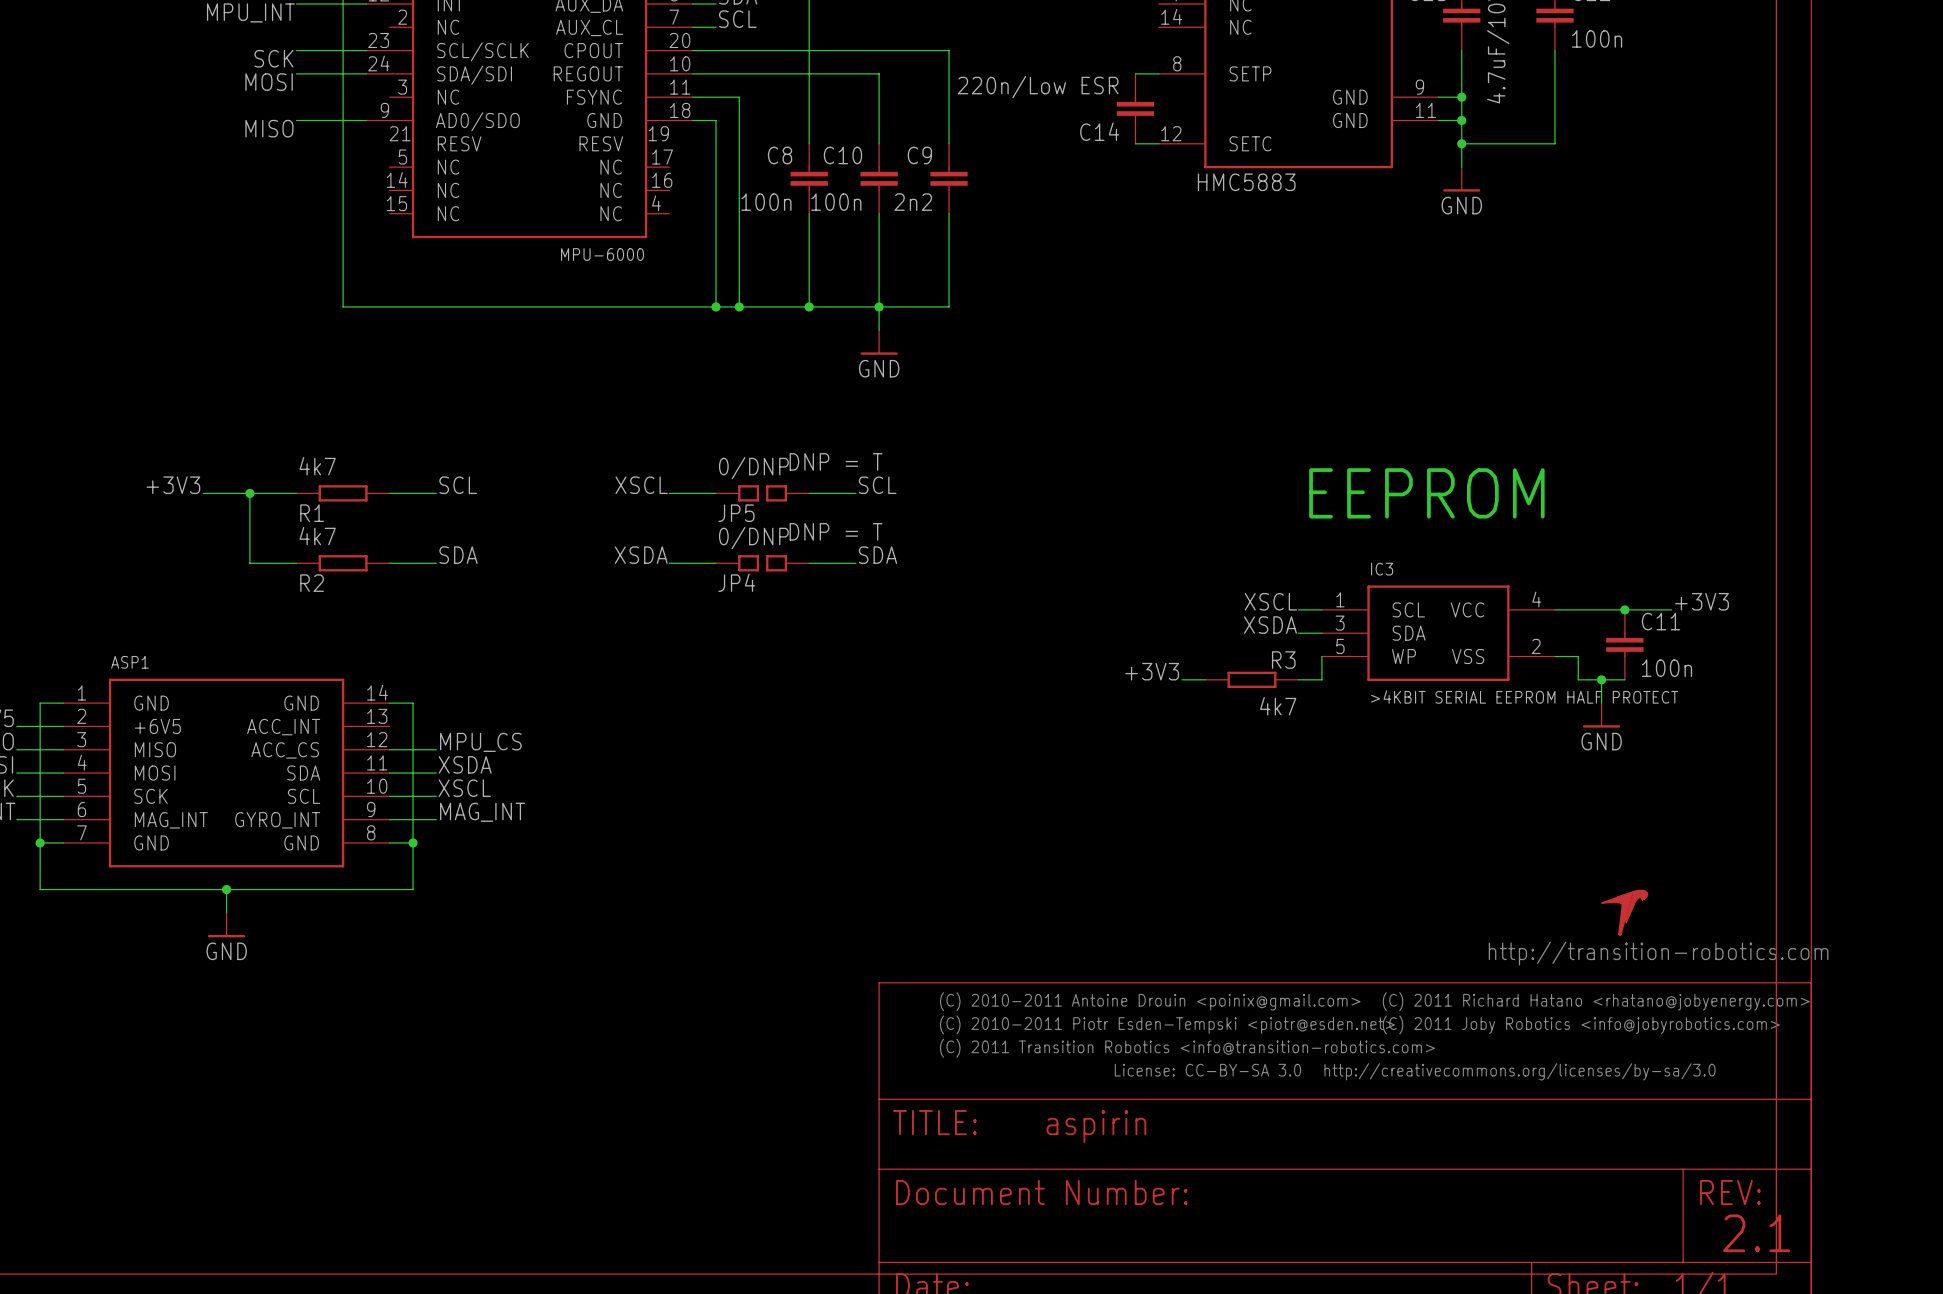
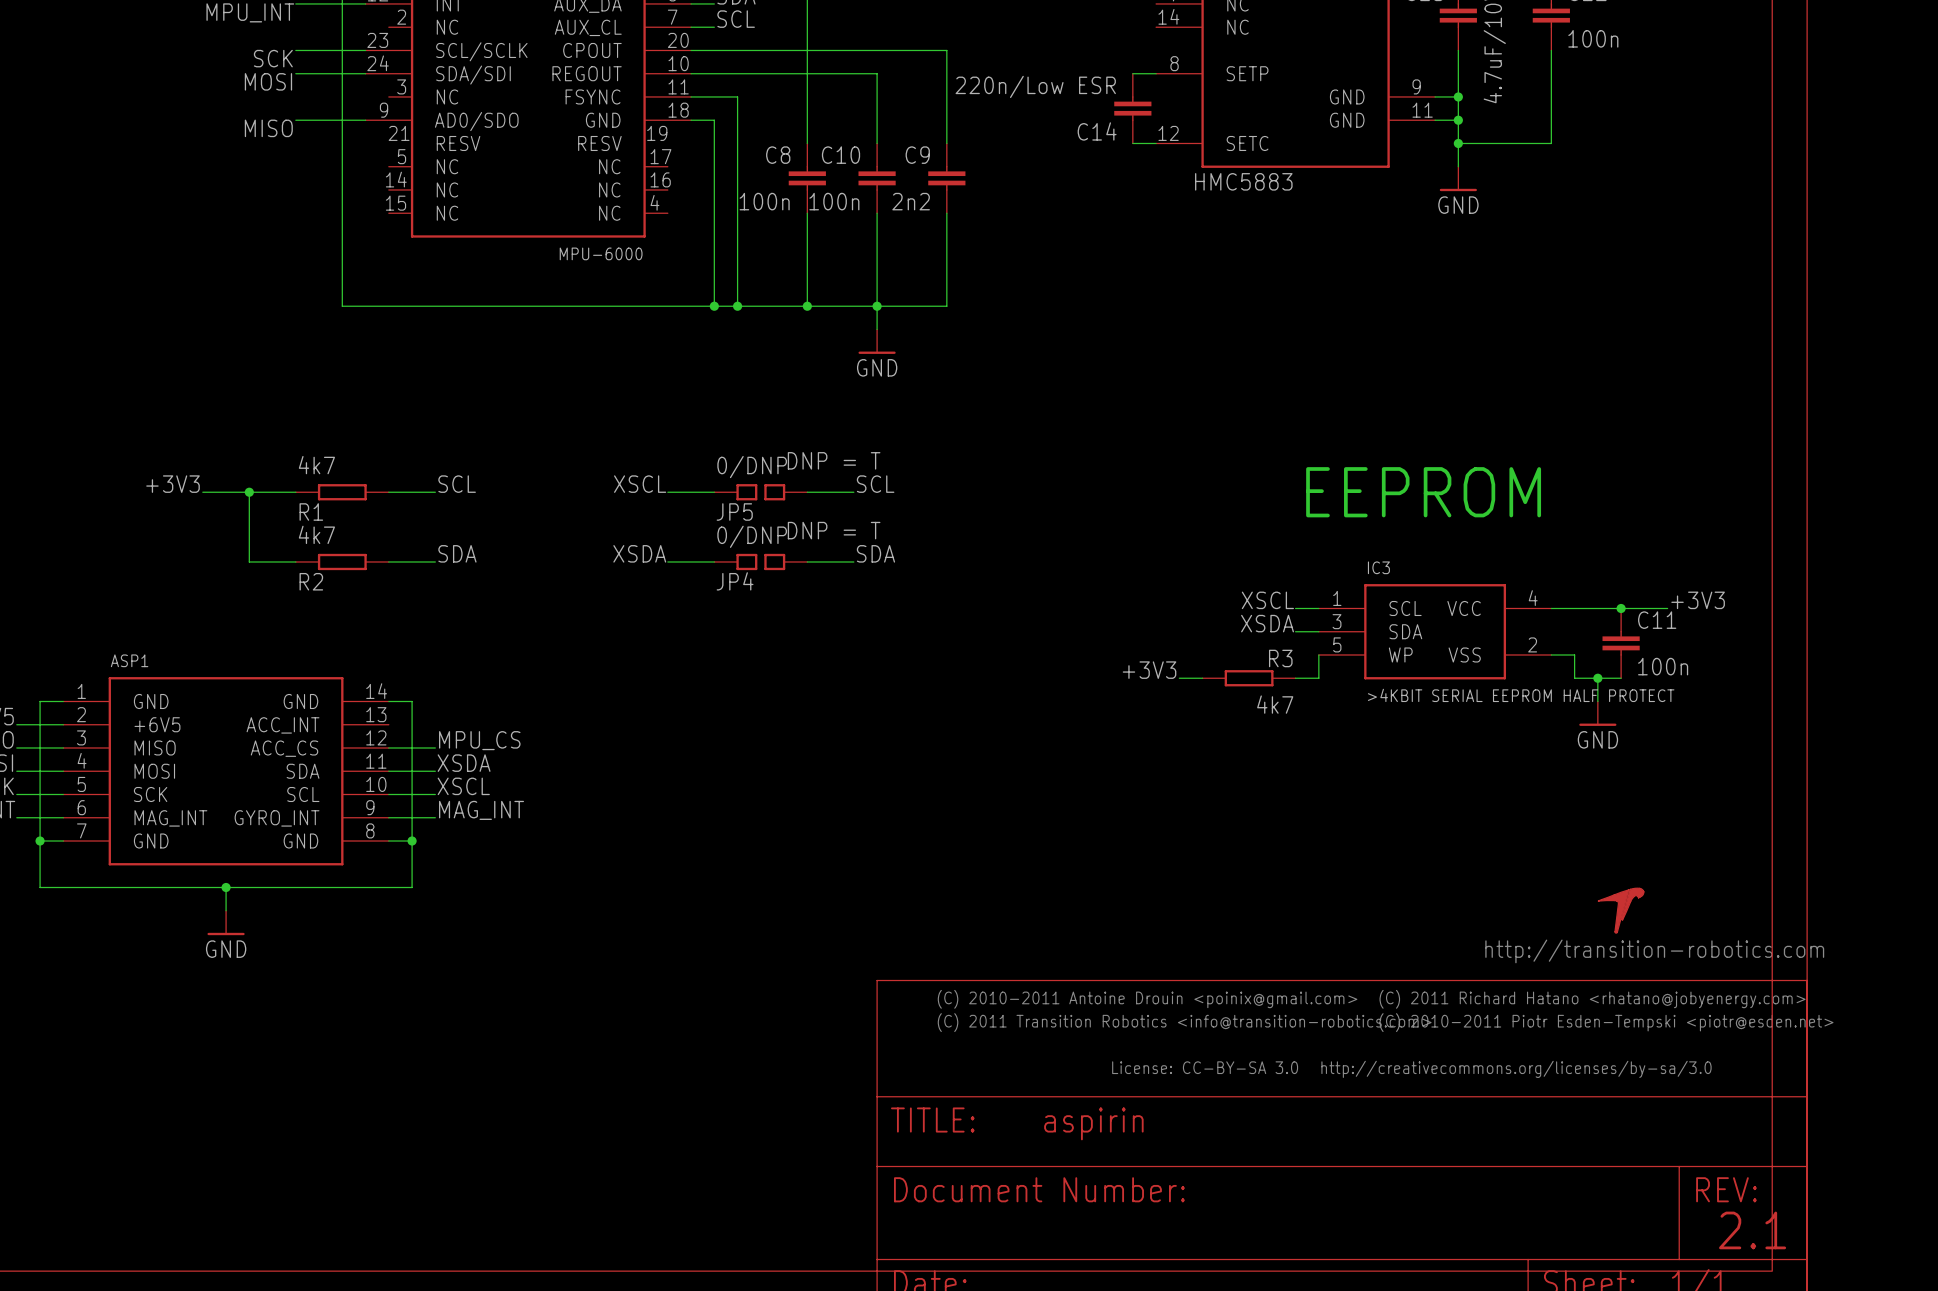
text: (C) 2010-2011 Piotr Esden-Tempski <piotr@esden.net> (1167, 1024) -> (C) 2011 Transition Robotics <info@transition-robotics.com> (1184, 1022)
text: (C) 2011 Joby Robotics <info@jobyrobotics.com> (1581, 1024) -> (C) 2010-2011 Piotr Esden-Tempski <piotr@esden.net> (1606, 1022)
text: (C) 2011 Transition Robotics <info@transition-robotics.com> (1187, 1048) -> none

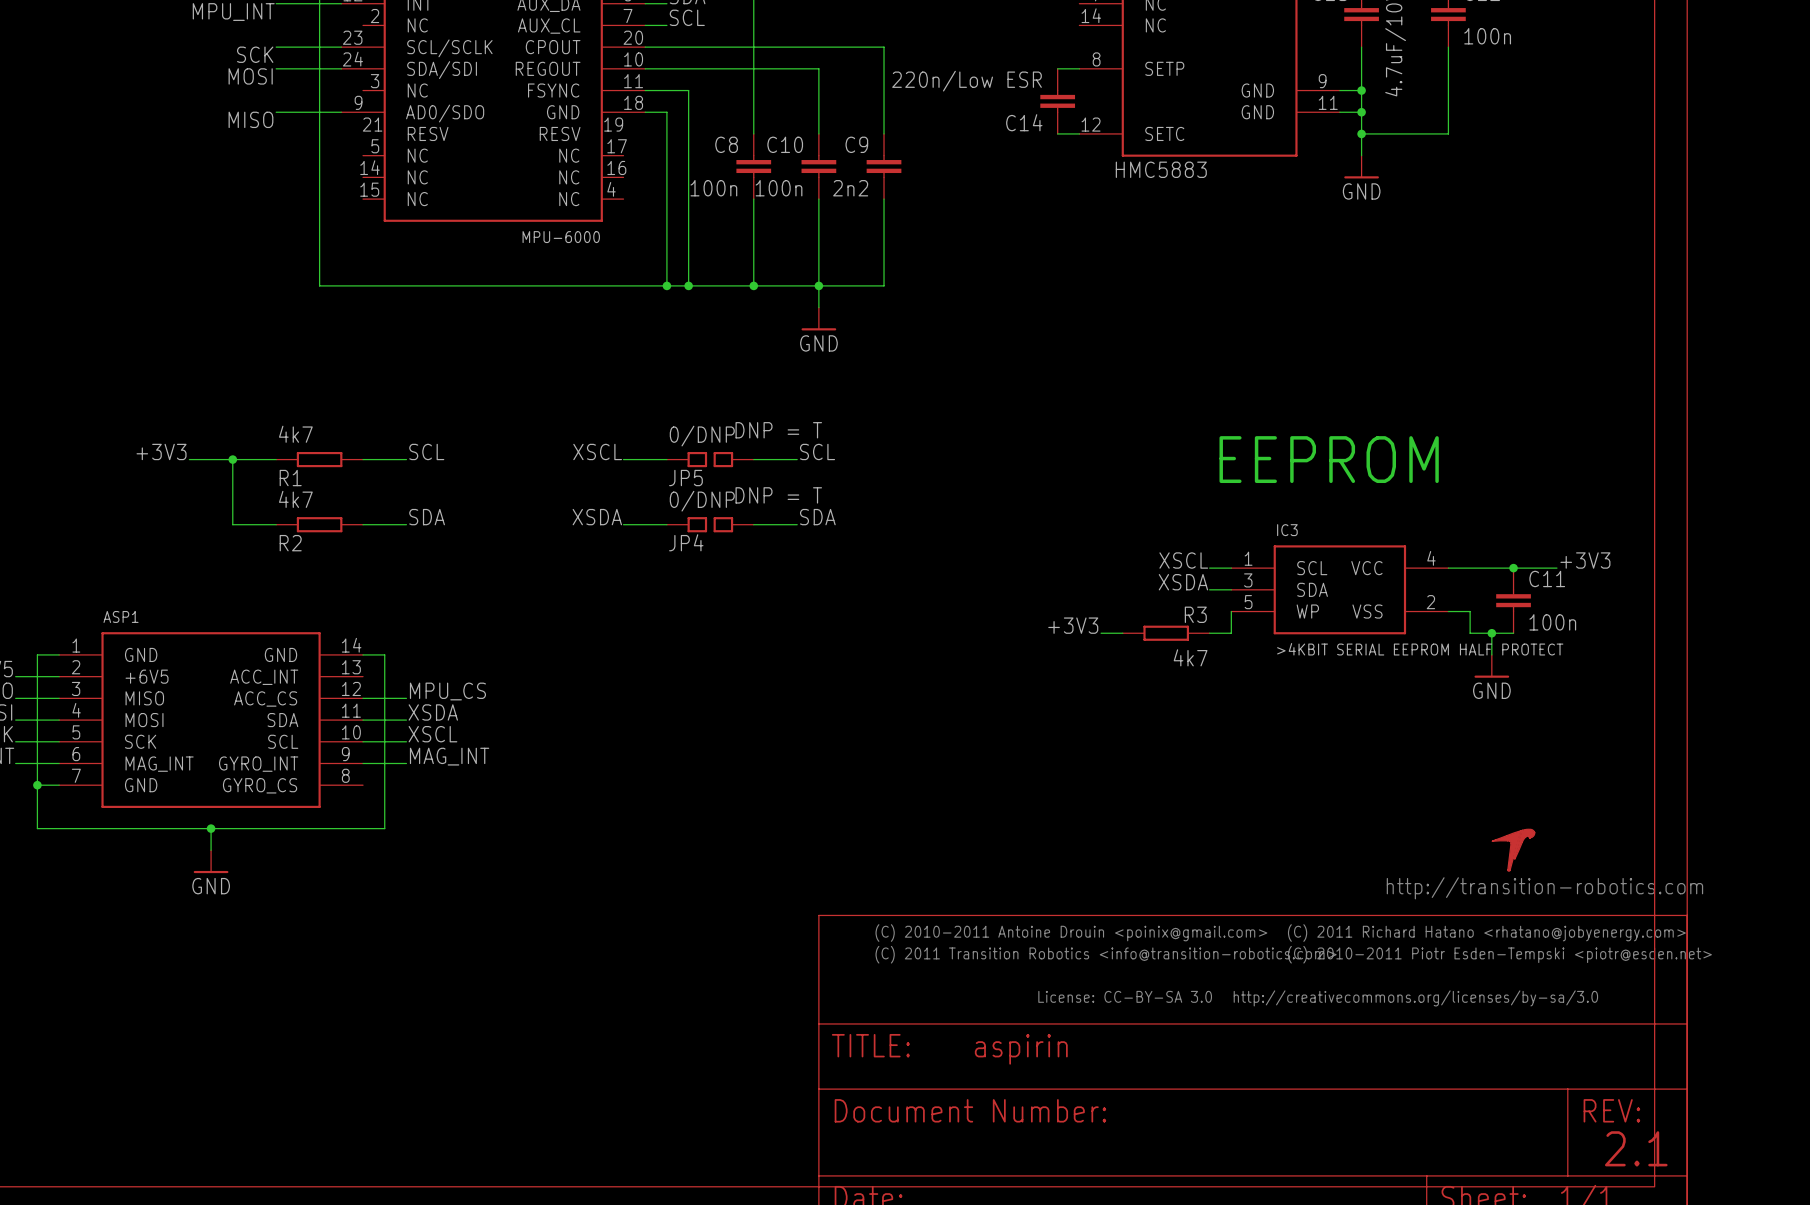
ASP1 pin name: GND (300, 841) -> GYRO_CS (260, 785)
wire: (388, 841) (412, 841) -> none
junction: (412, 841) -> none

